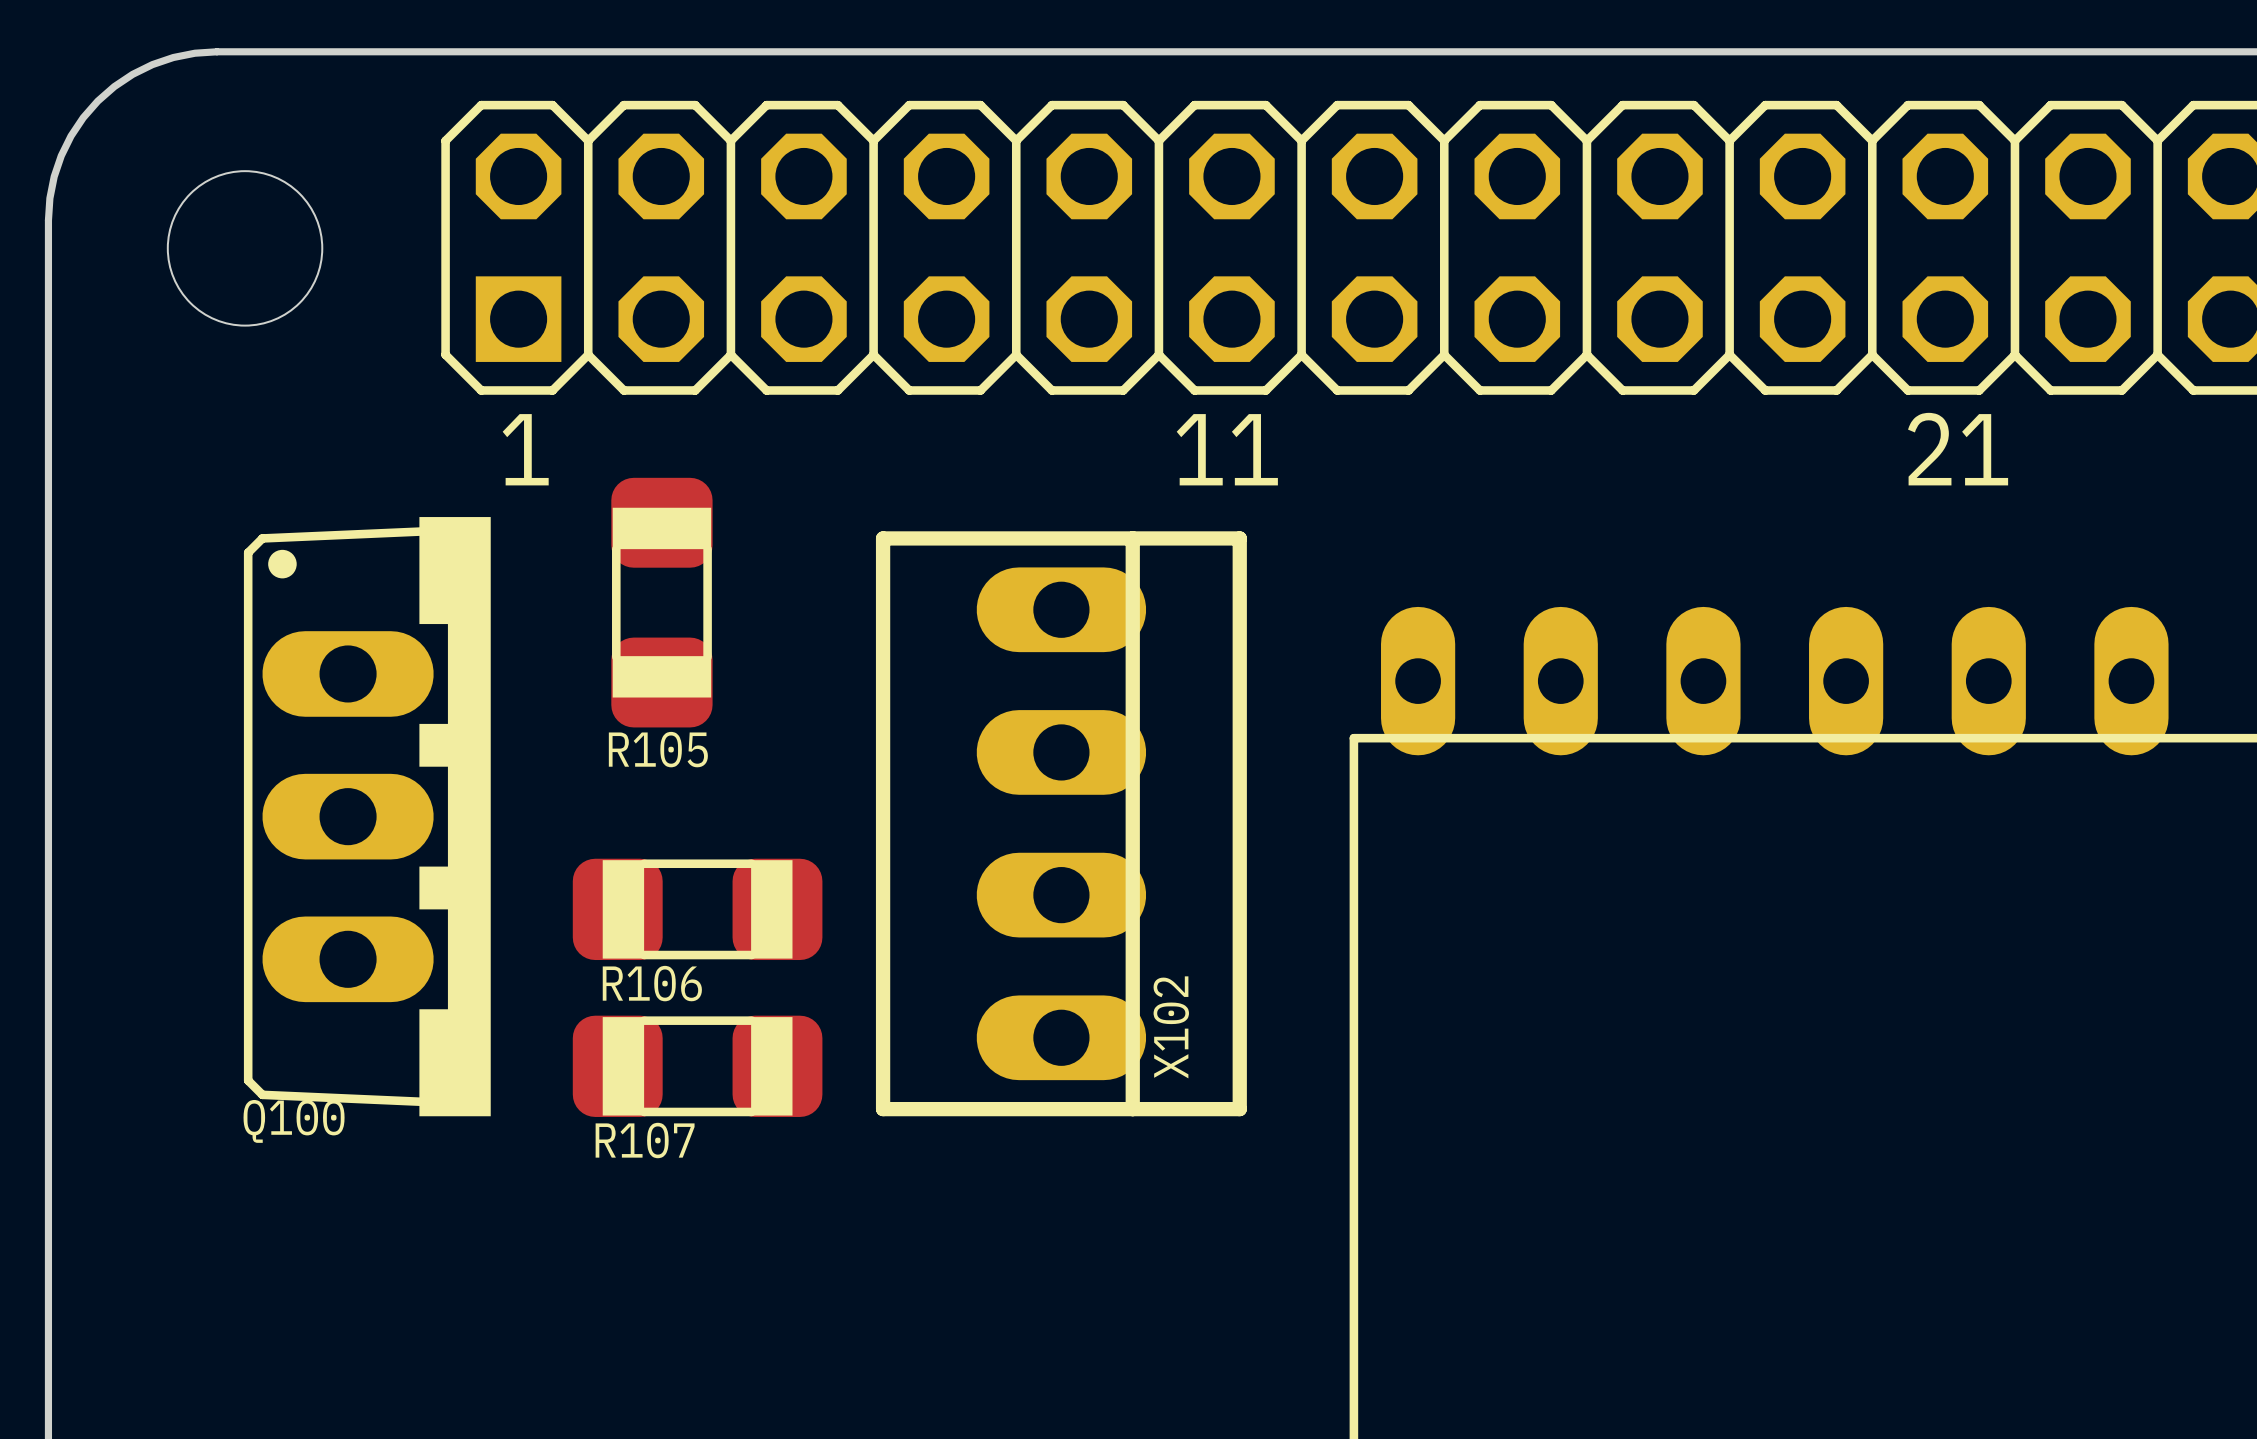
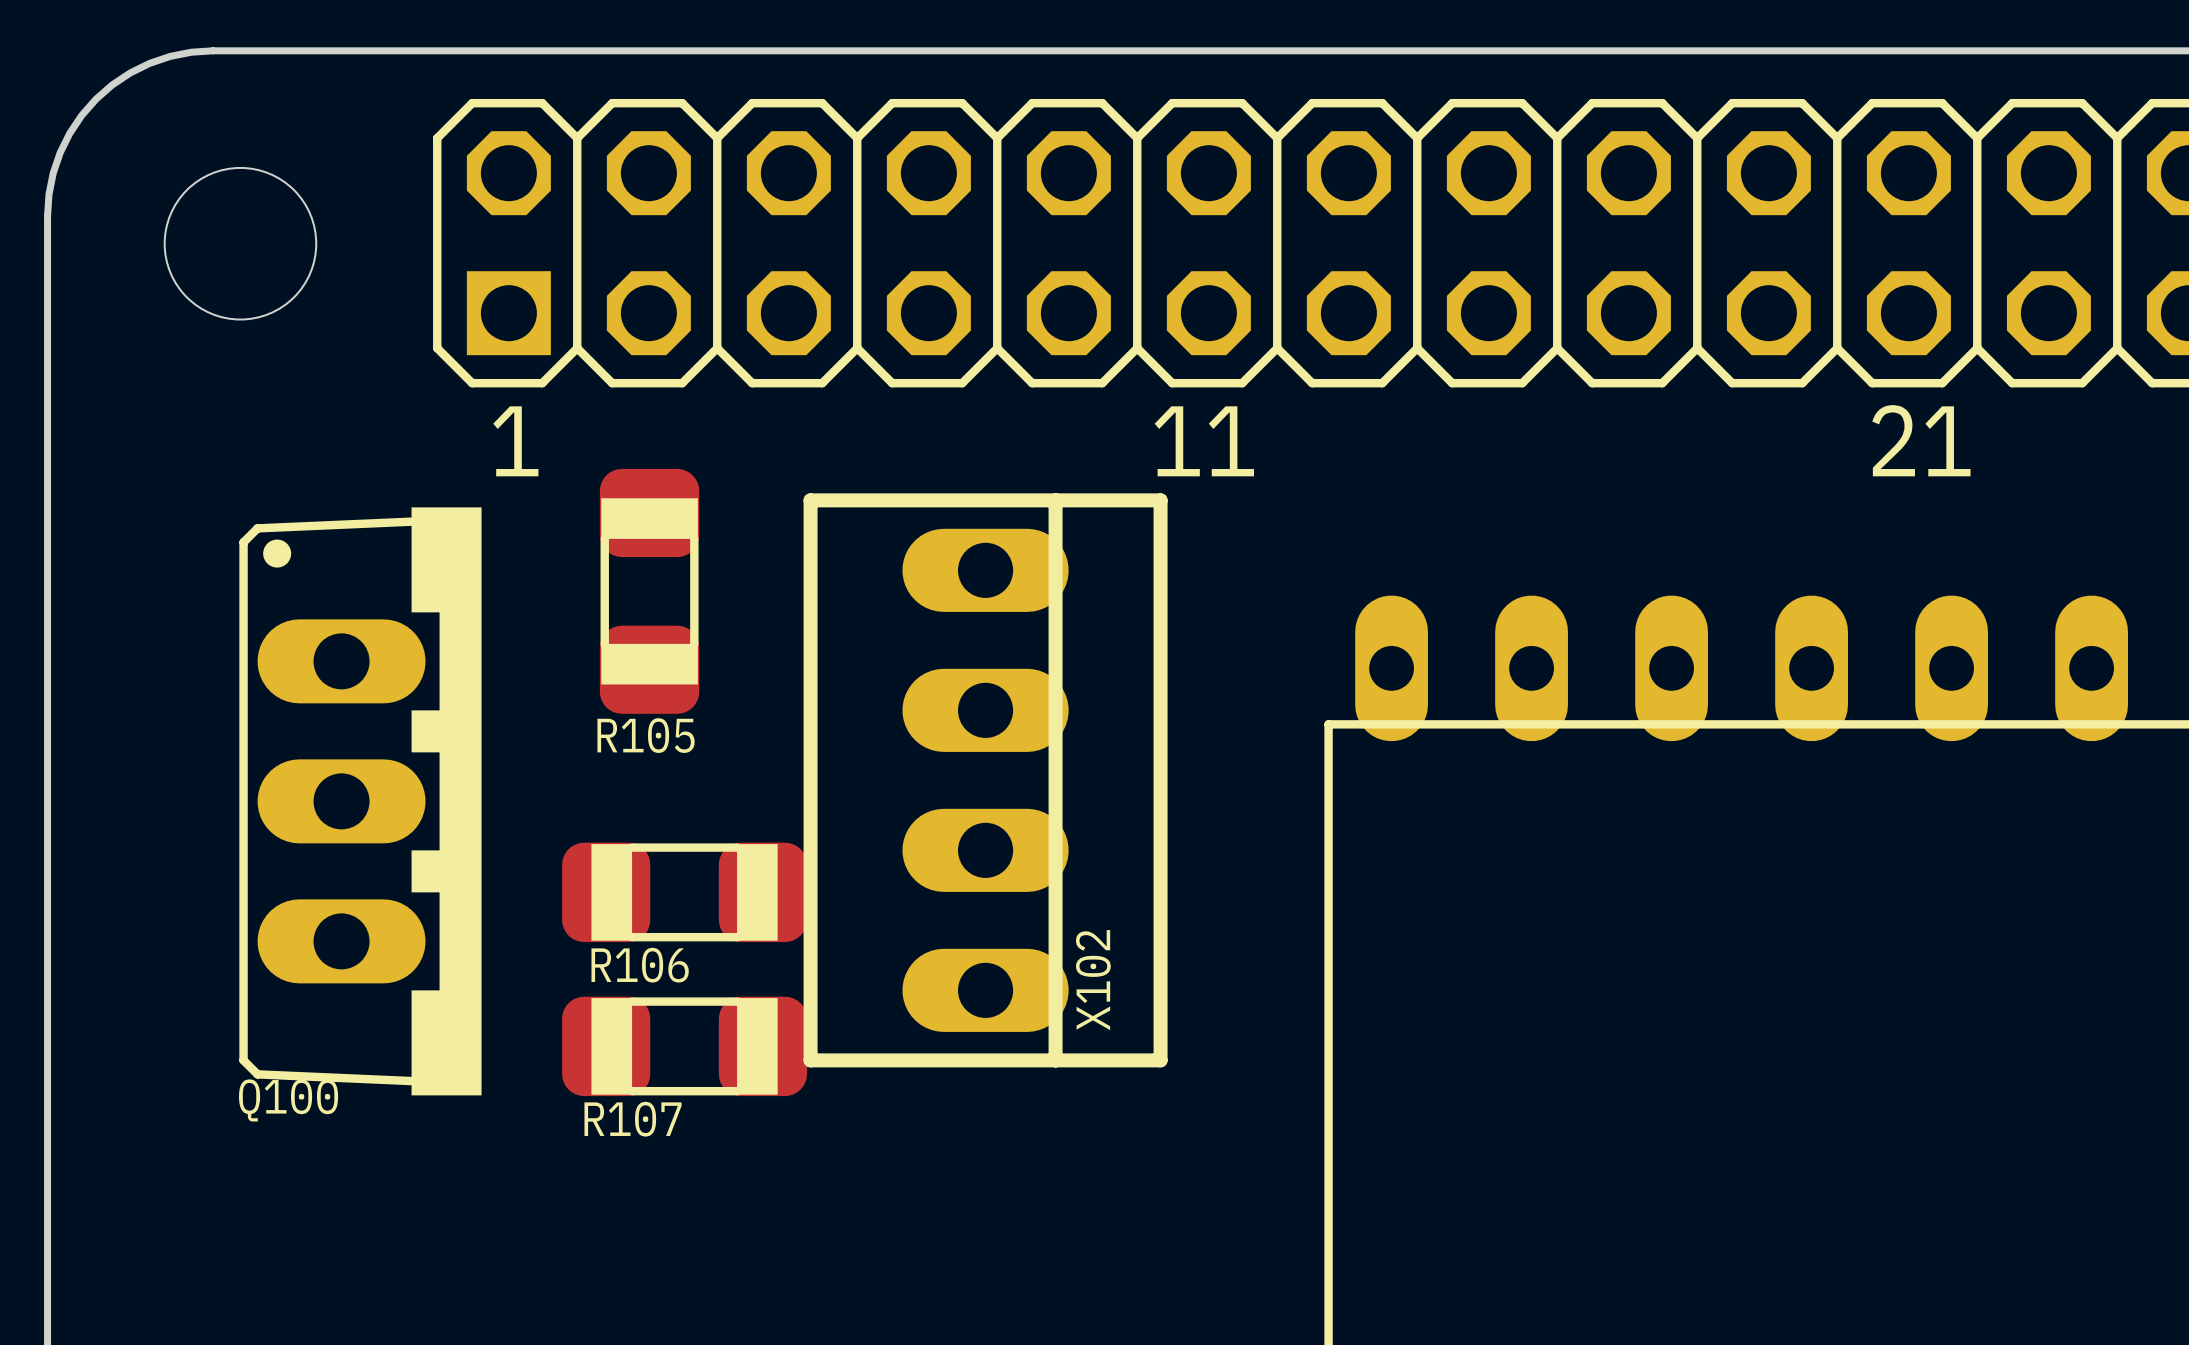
X102 position: (1061, 823) -> (985, 780)

